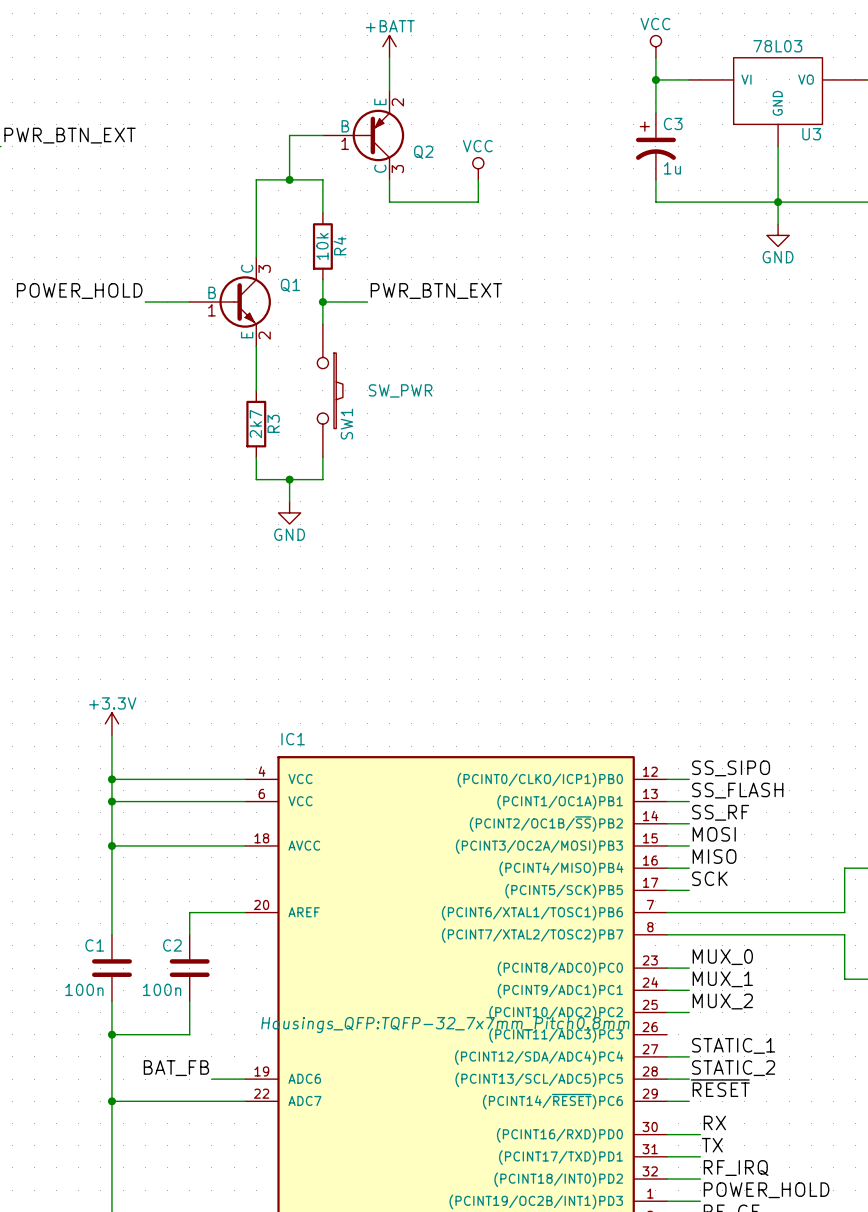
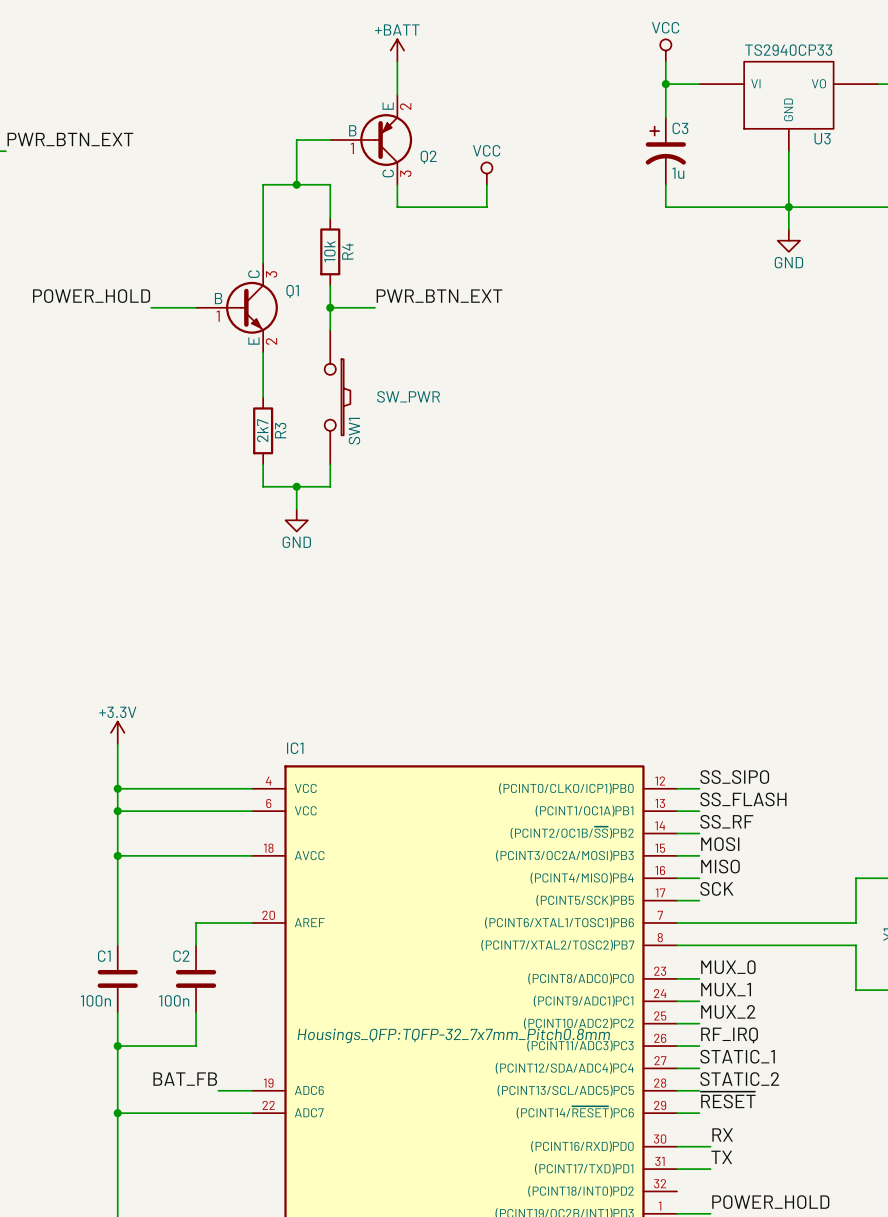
U3 value: 78L03 (777, 46) -> TS2940CP33 (788, 50)
wire: none -> (677, 1046) (699, 1046)
label position: RF_IRQ (736, 1168) -> RF_IRQ (729, 1035)
wire: (667, 1179) (700, 1179) -> none

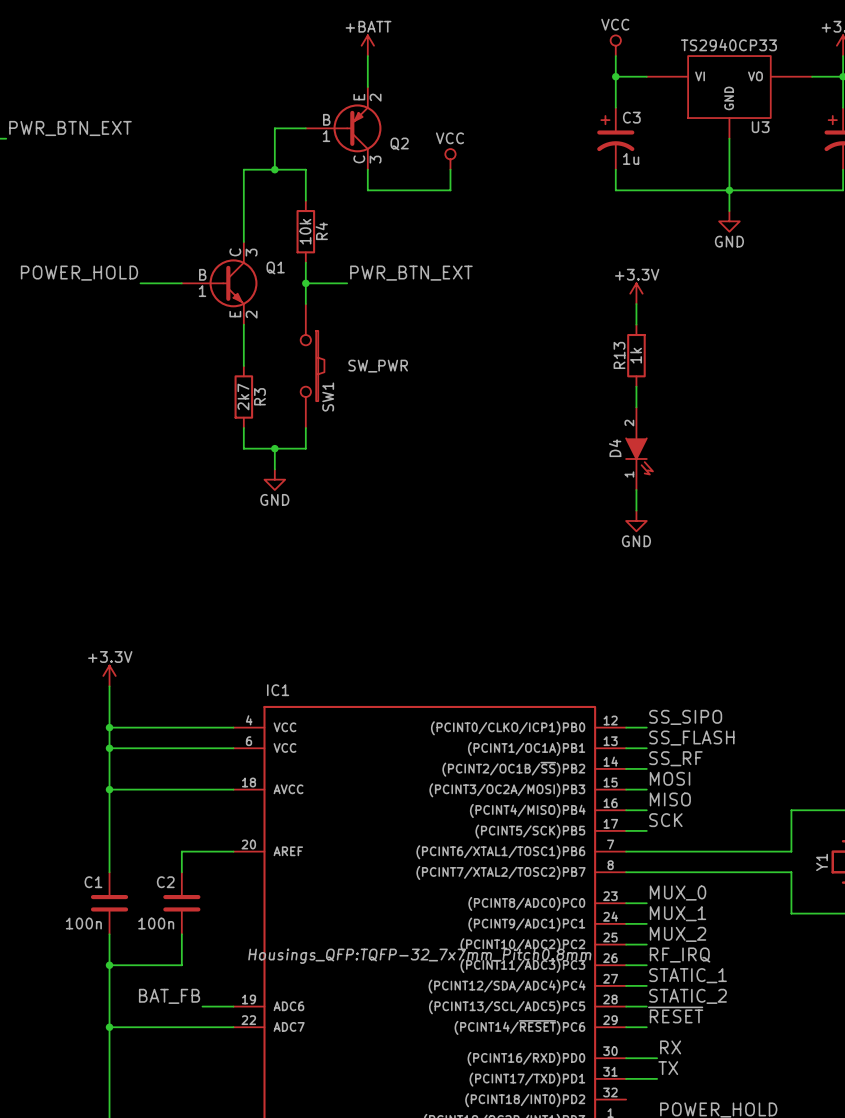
power symbol: none -> +3.3V (636, 293)
wire: none -> (636, 304) (636, 324)
R13: none -> 1k (636, 355)
wire: none -> (636, 386) (636, 407)
D4: none -> (639, 448)
wire: none -> (636, 489) (636, 510)
power symbol: none -> GND (636, 520)

